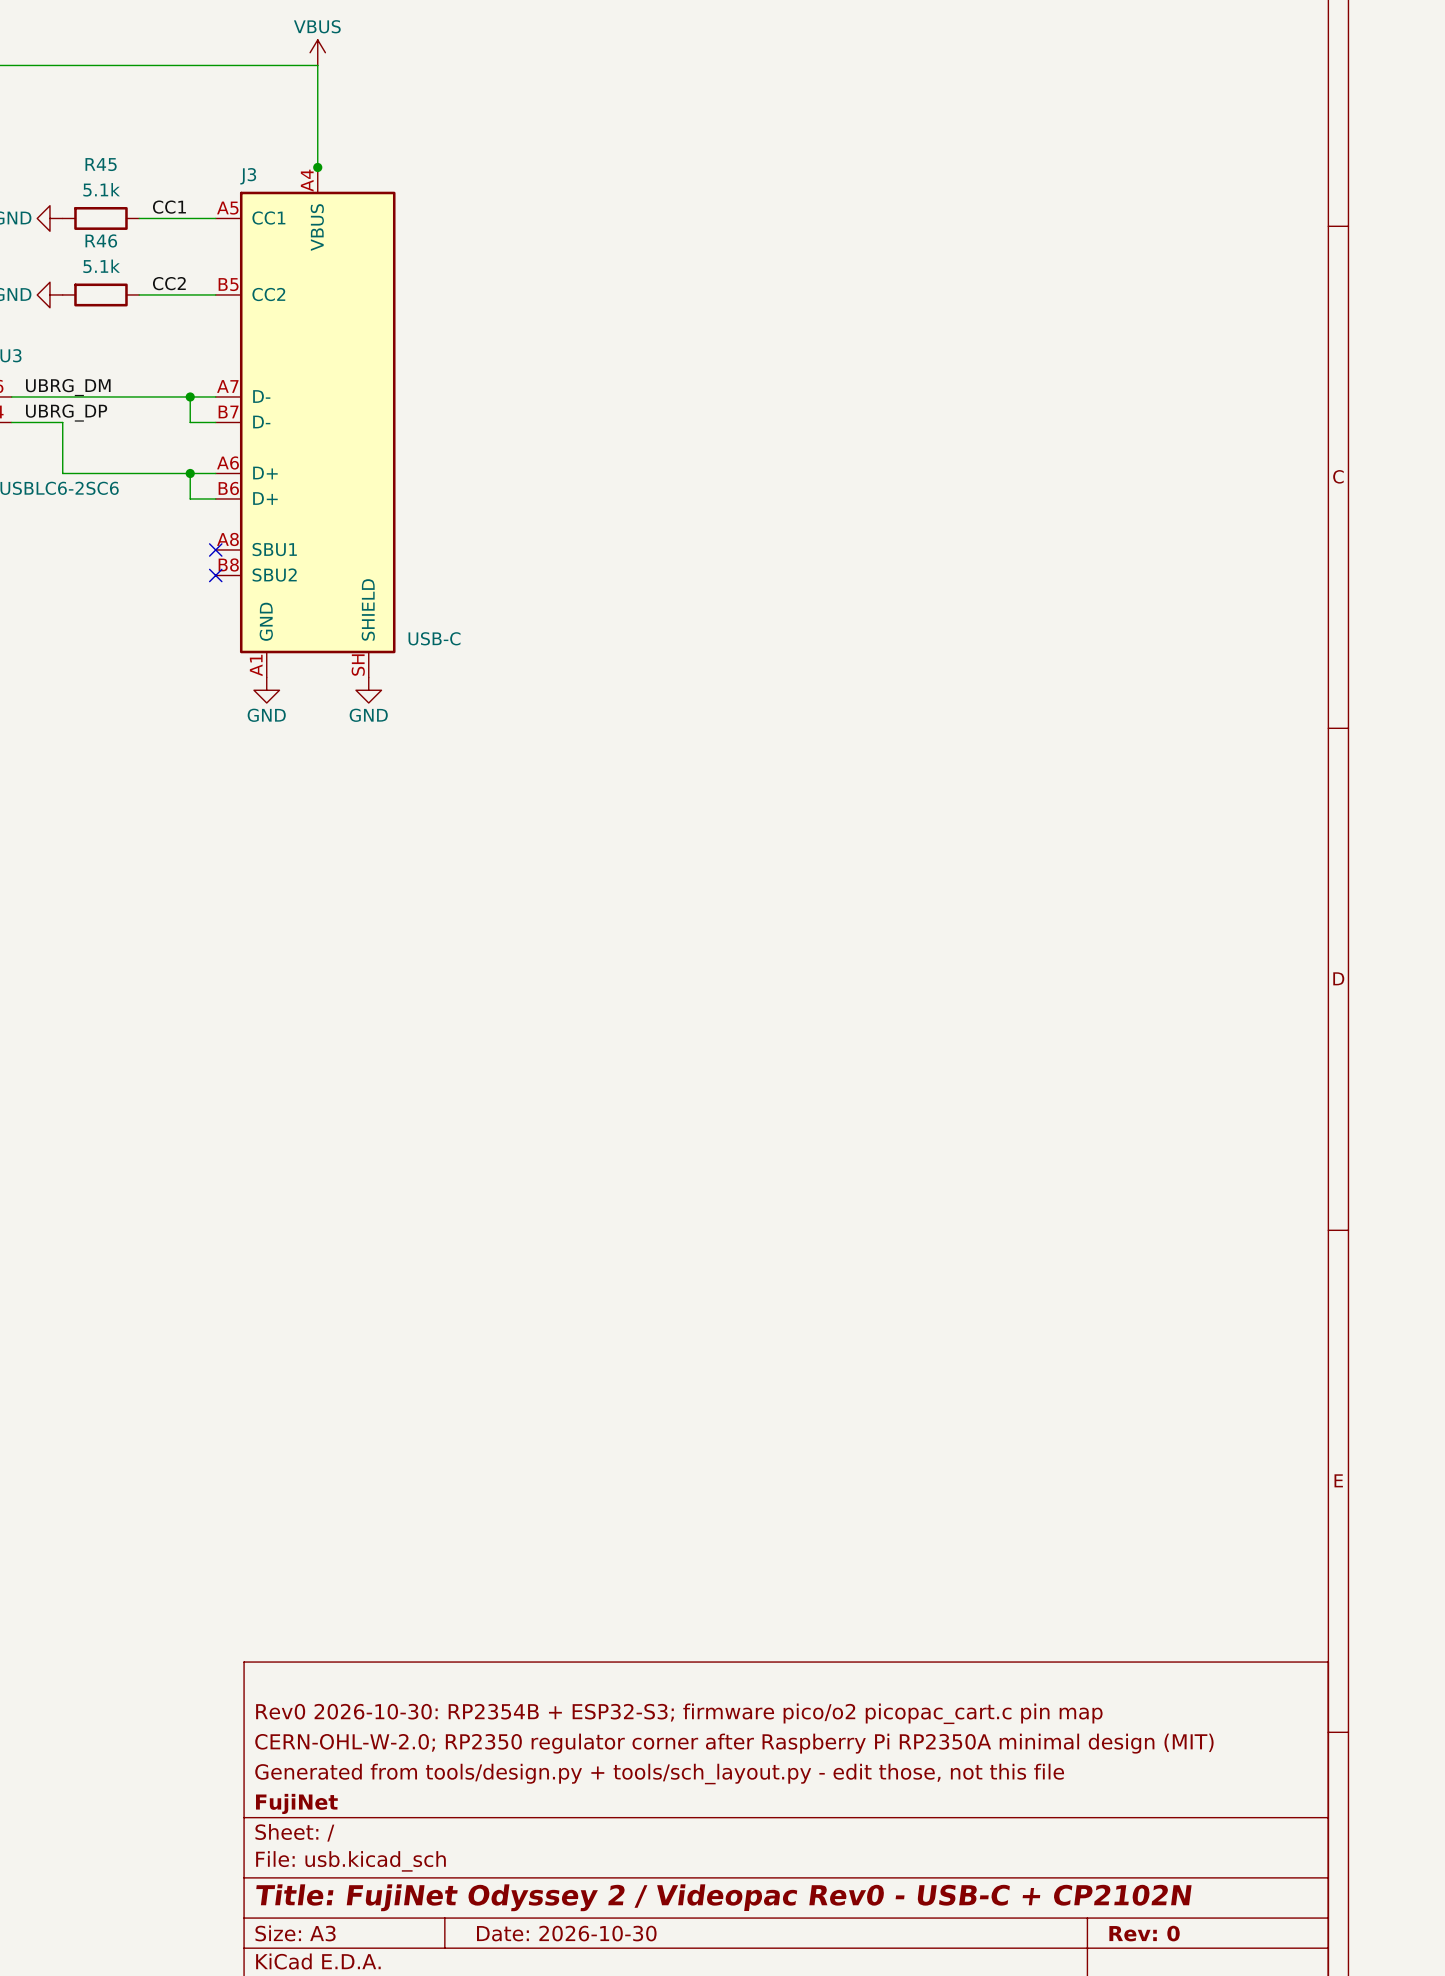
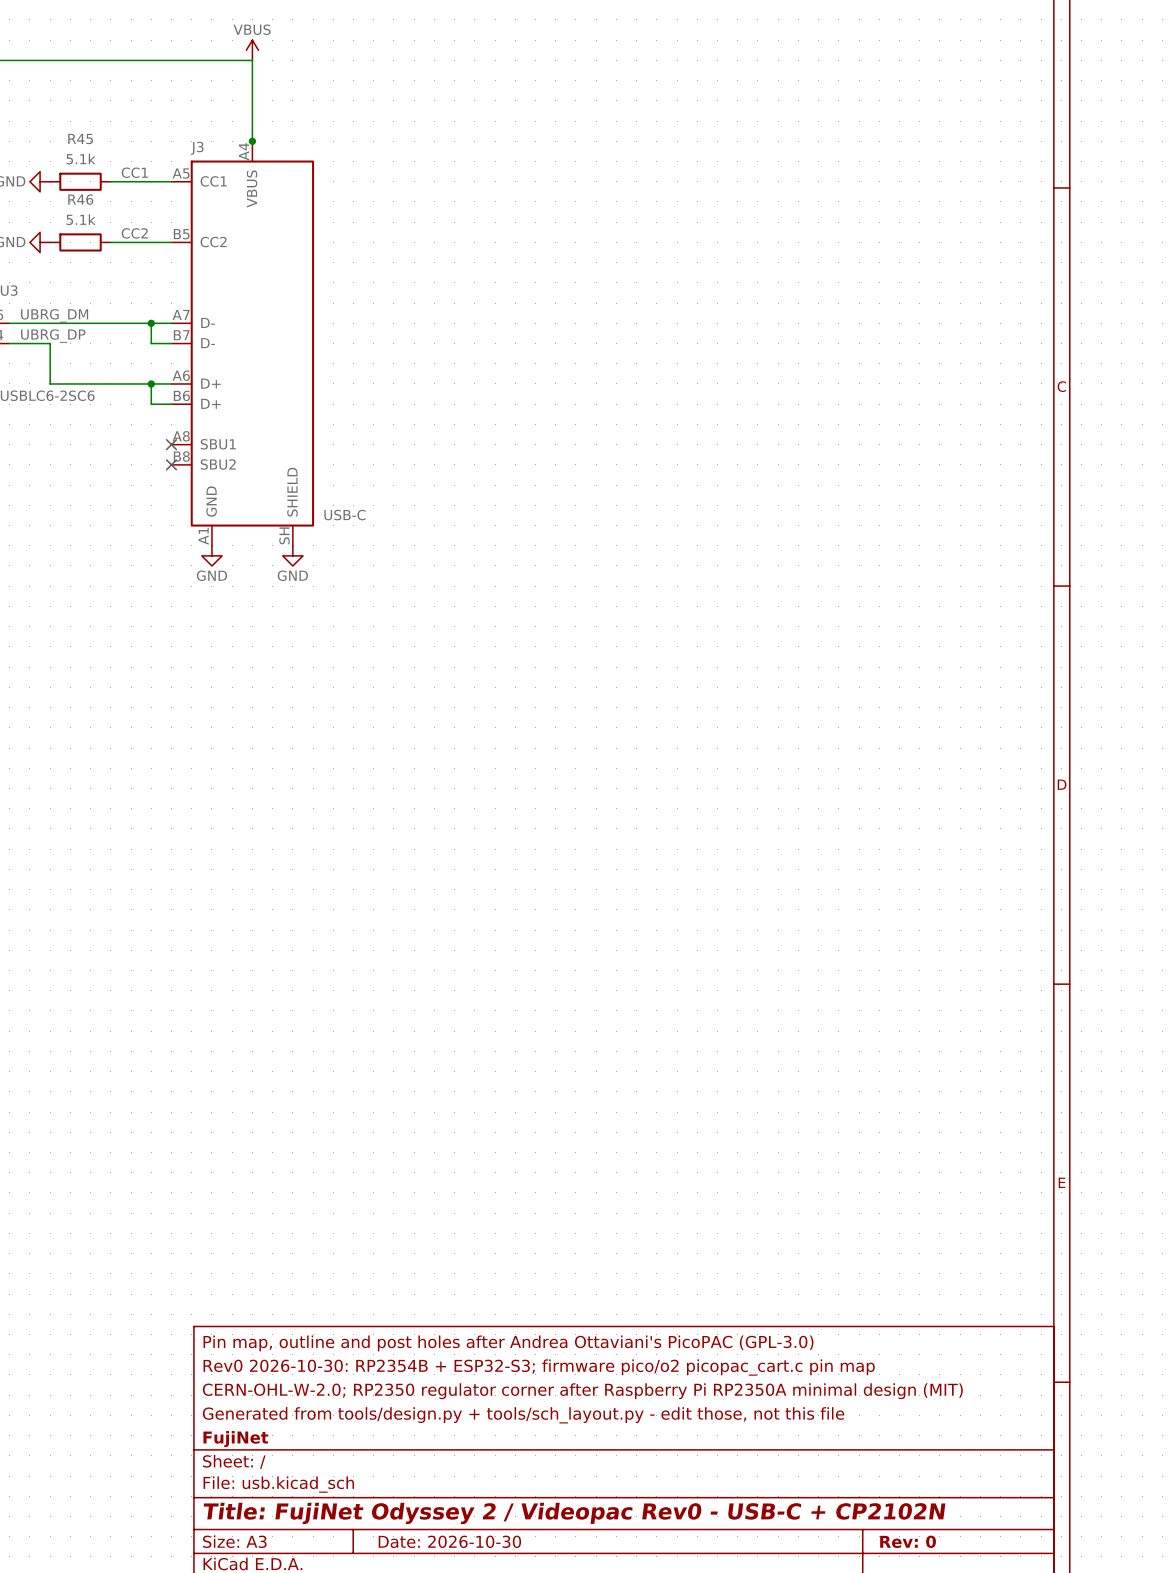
title block: none -> Pin map, outline and post holes after Andrea Ottaviani's PicoPAC (GPL-3.0) (508, 1343)

